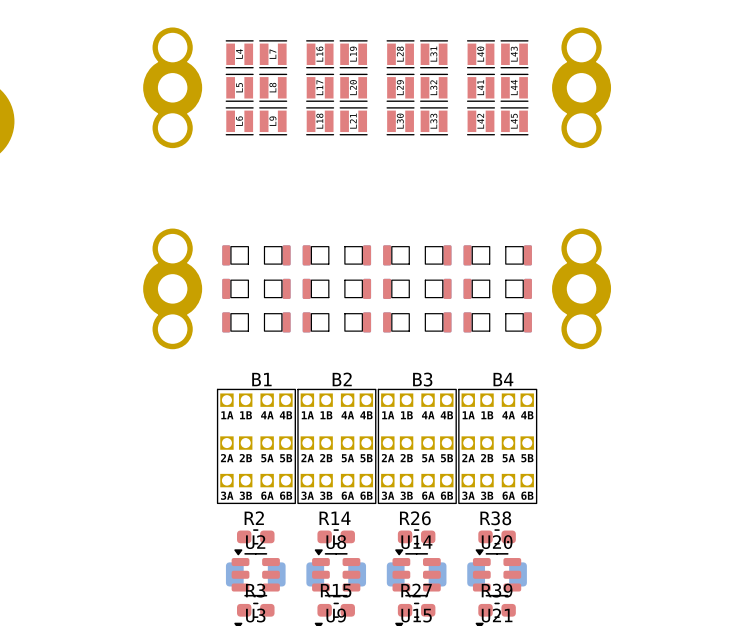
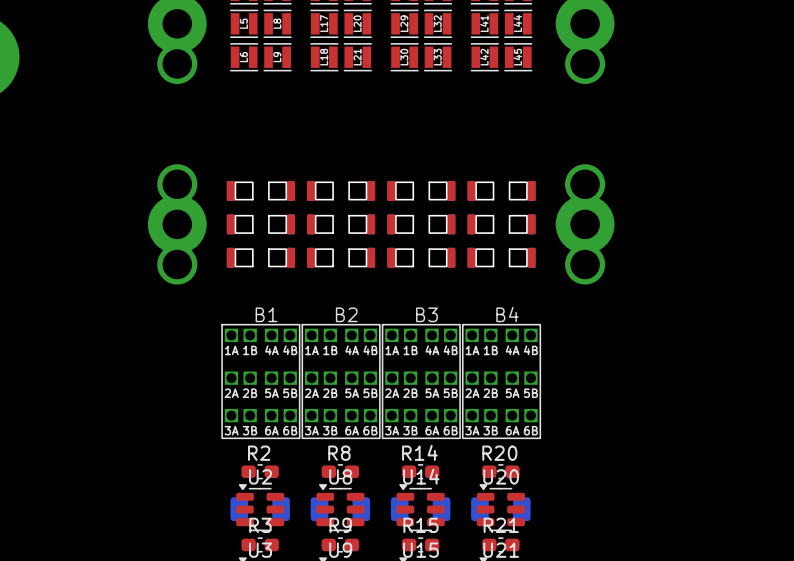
R14 name: R14 (335, 518) -> R8 (339, 453)
R26 name: R26 (415, 518) -> R14 (419, 452)
R38 name: R38 (495, 518) -> R20 (499, 453)
R15 name: R15 (336, 590) -> R9 (340, 525)
R27 name: R27 (416, 590) -> R15 (420, 525)
R39 name: R39 (497, 590) -> R21 (501, 525)

